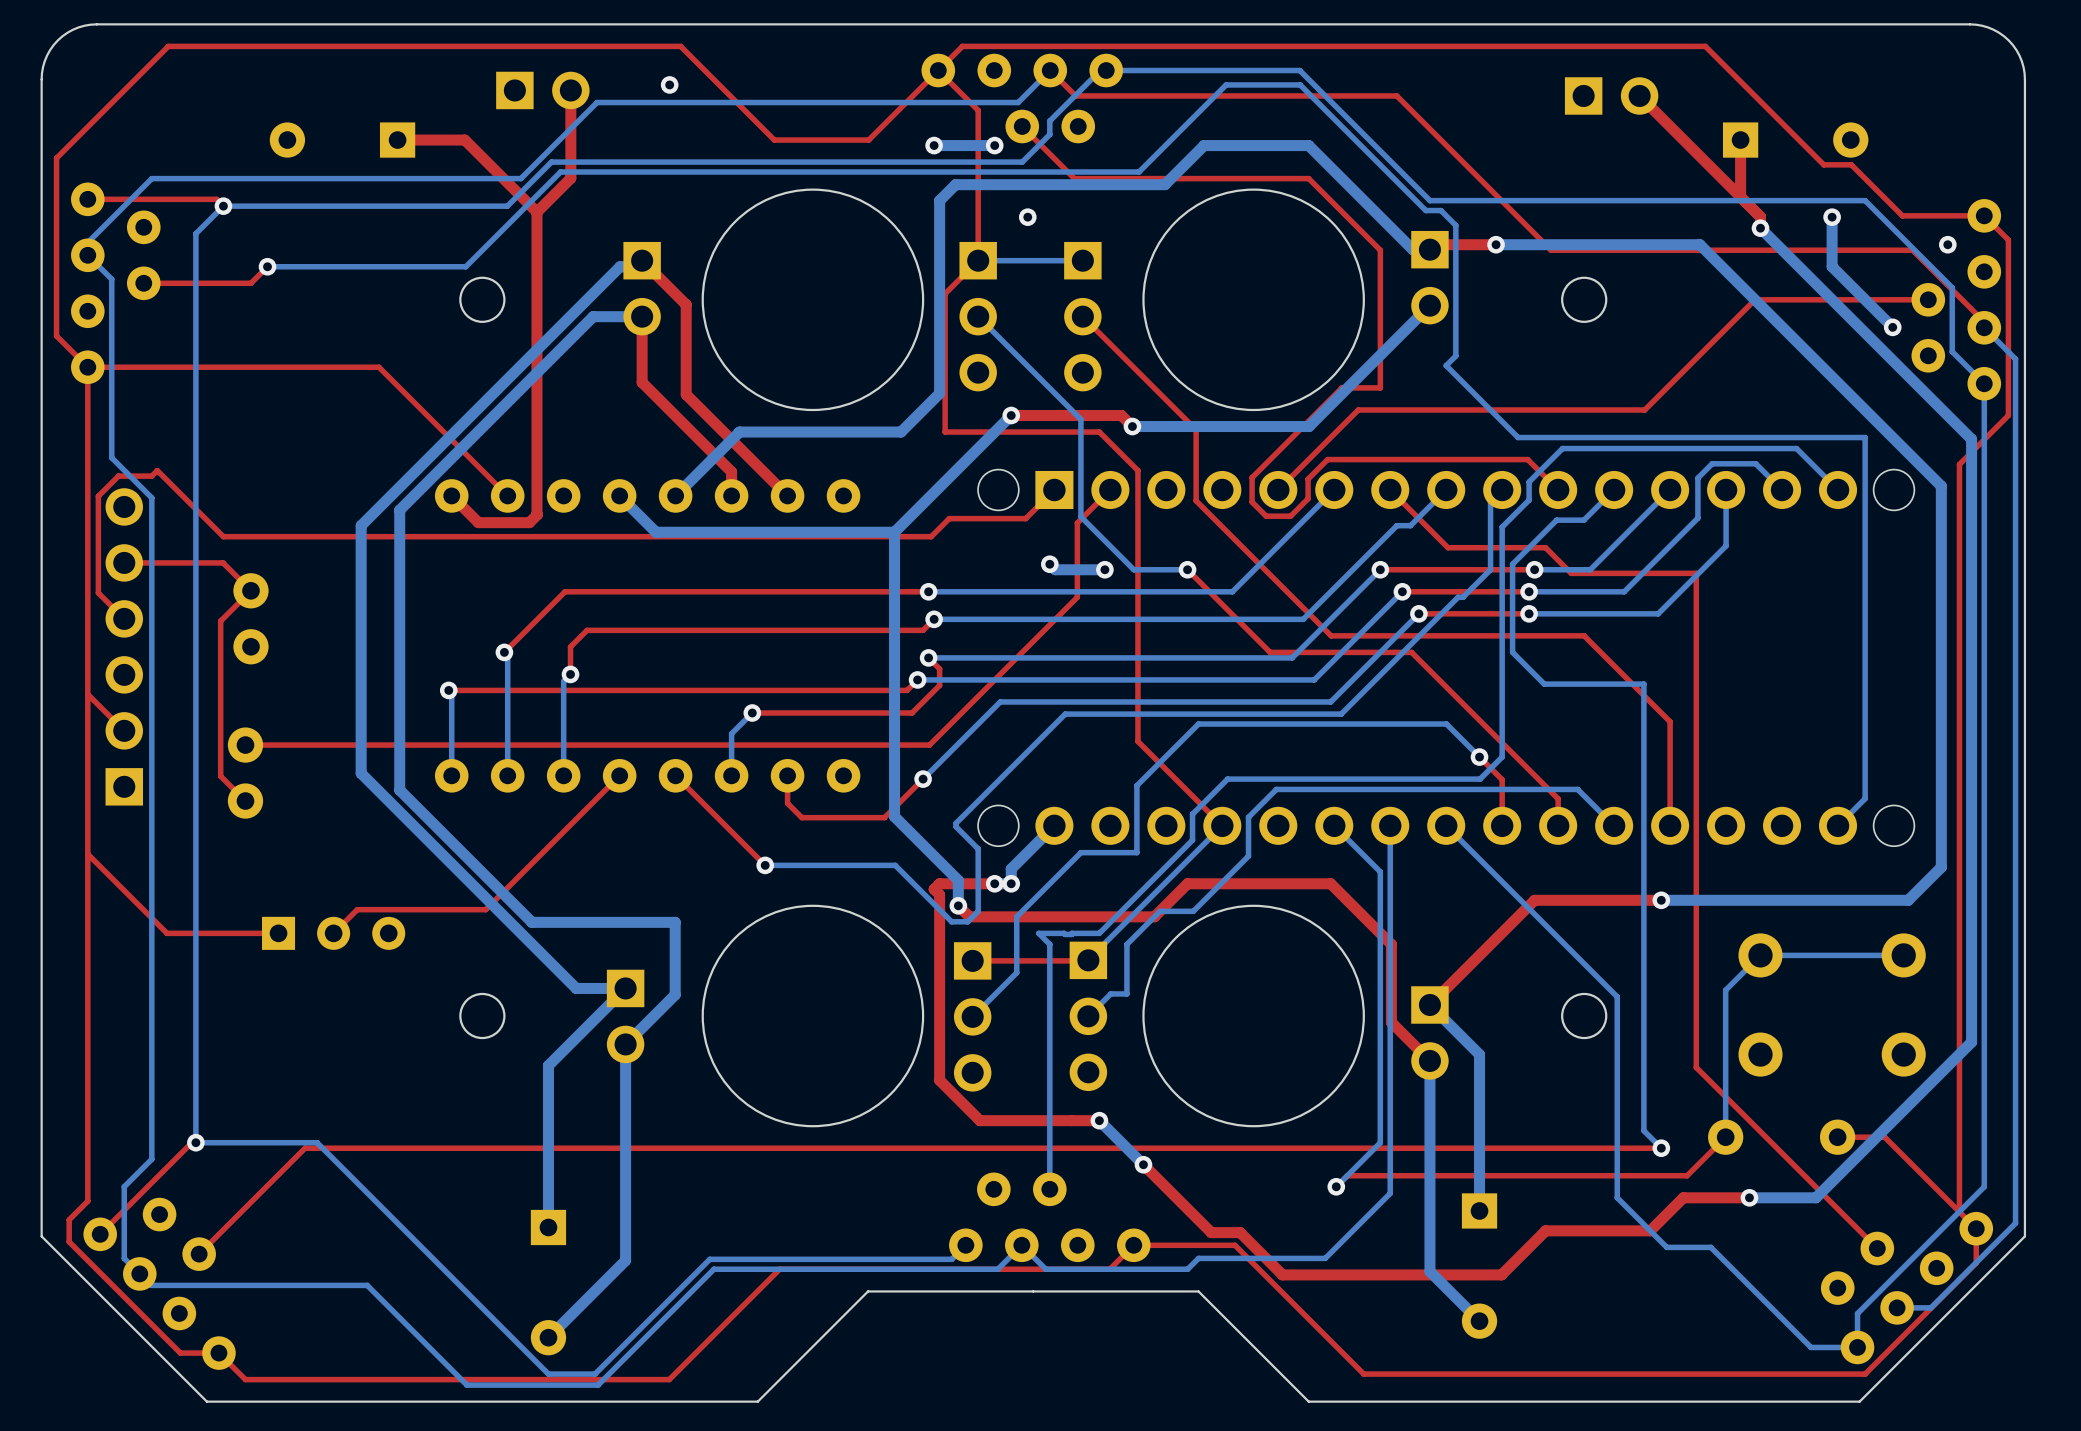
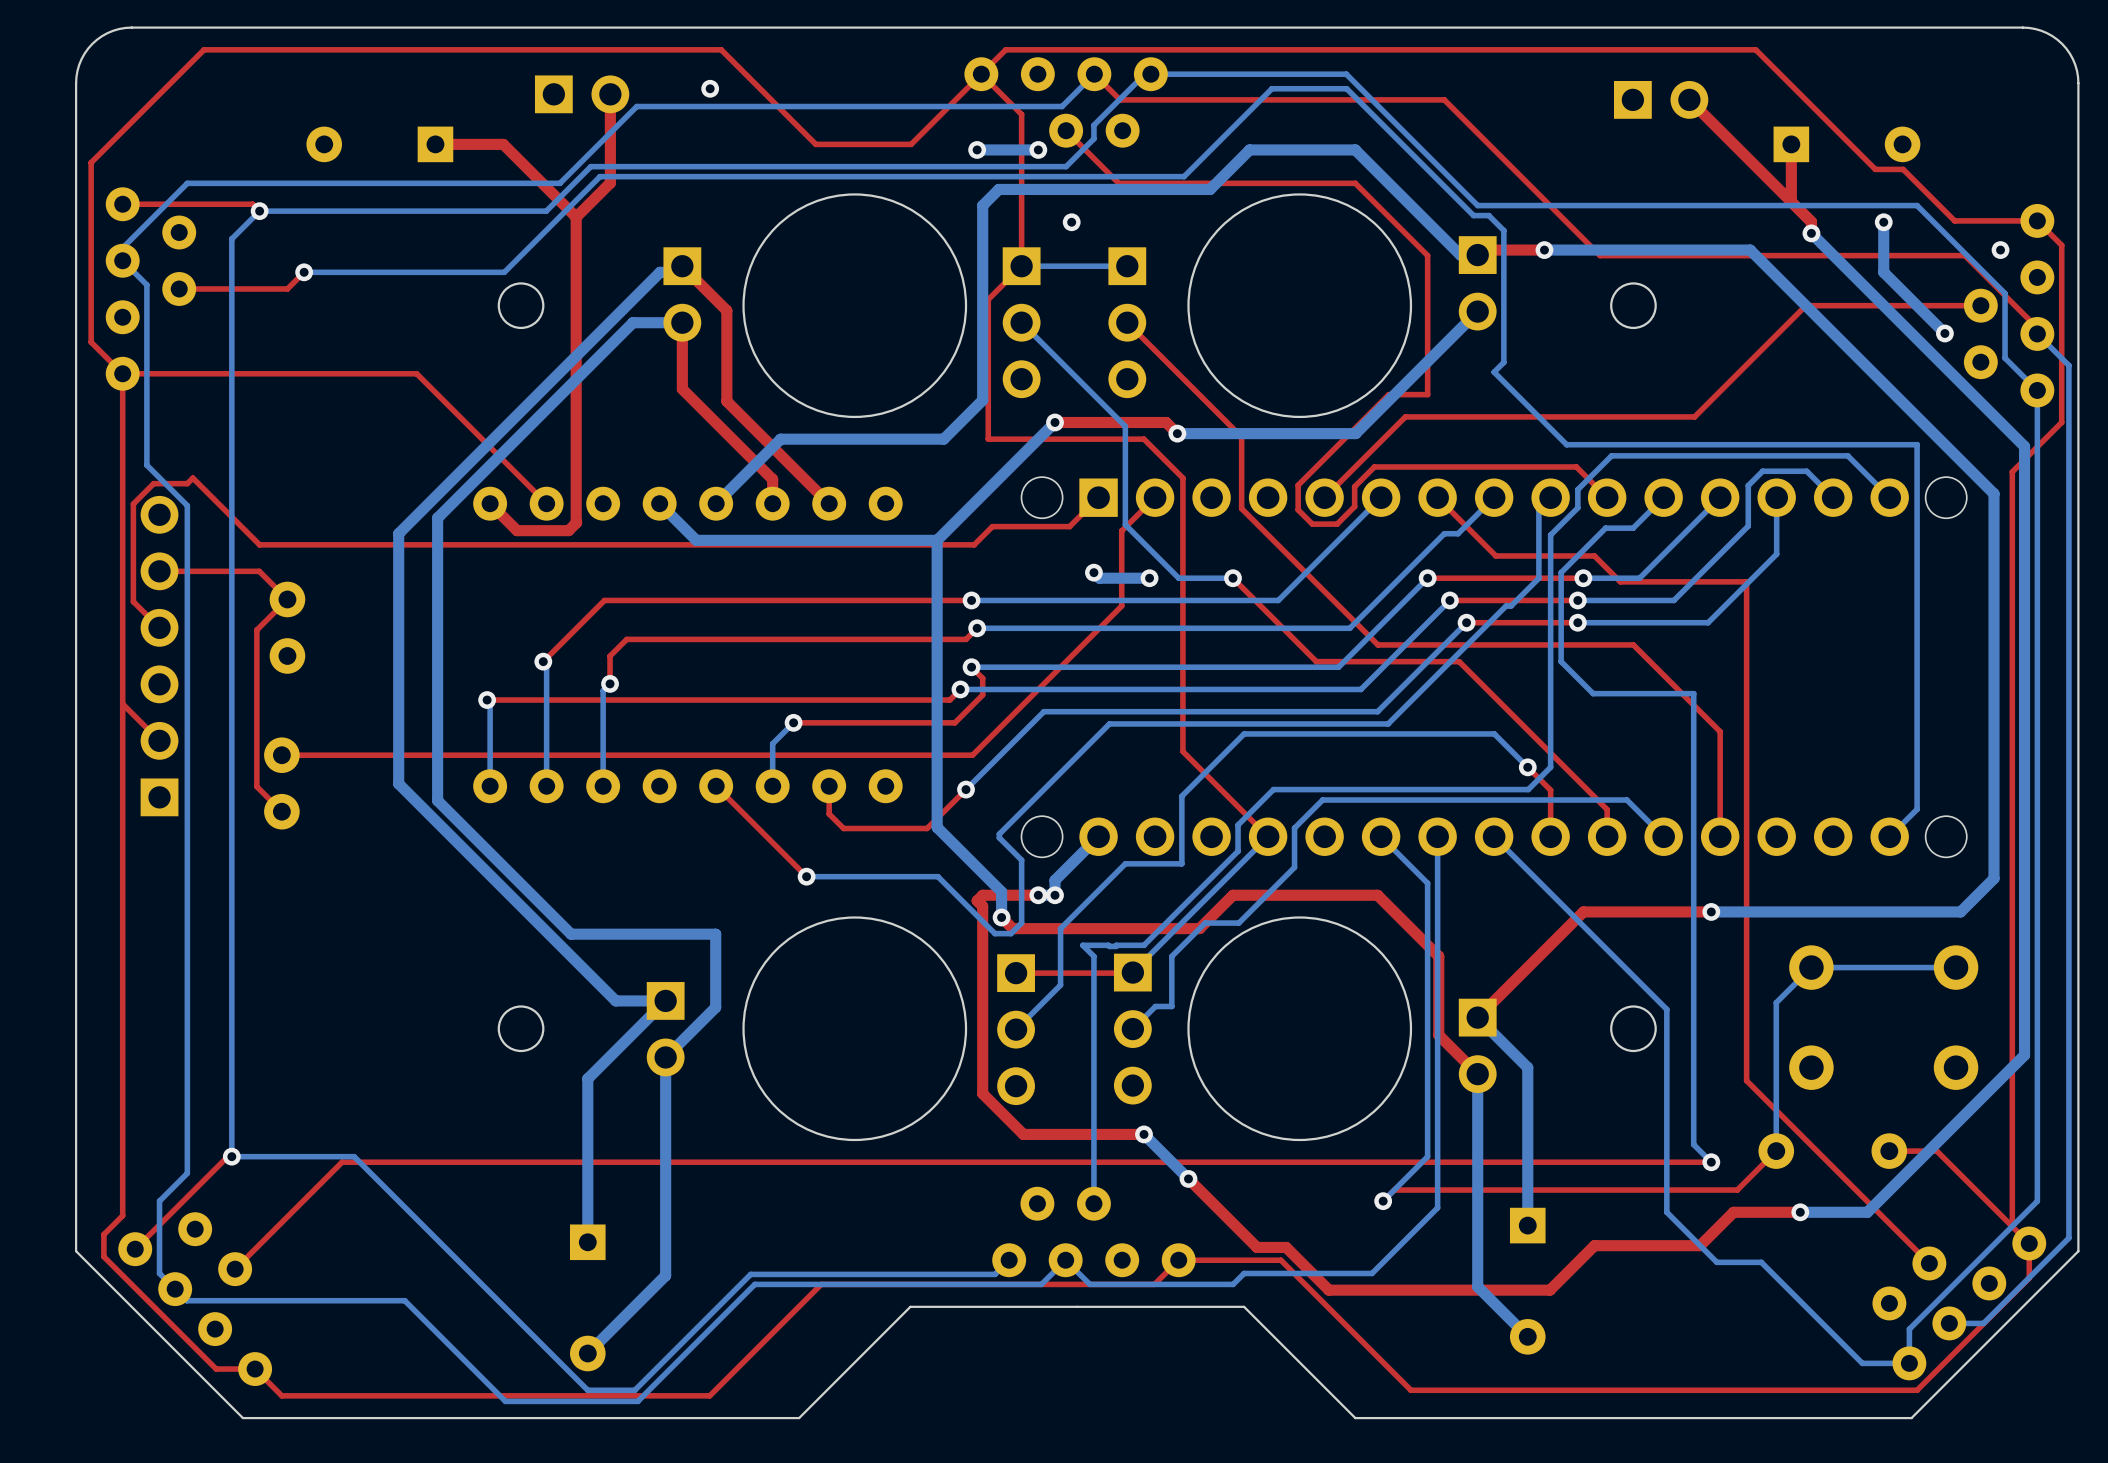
top track: (619, 775) (485, 909) (357, 909) (333, 933) -> none
top track: (87, 854) (167, 933) (278, 933) -> none
part: (333, 933) -> none

